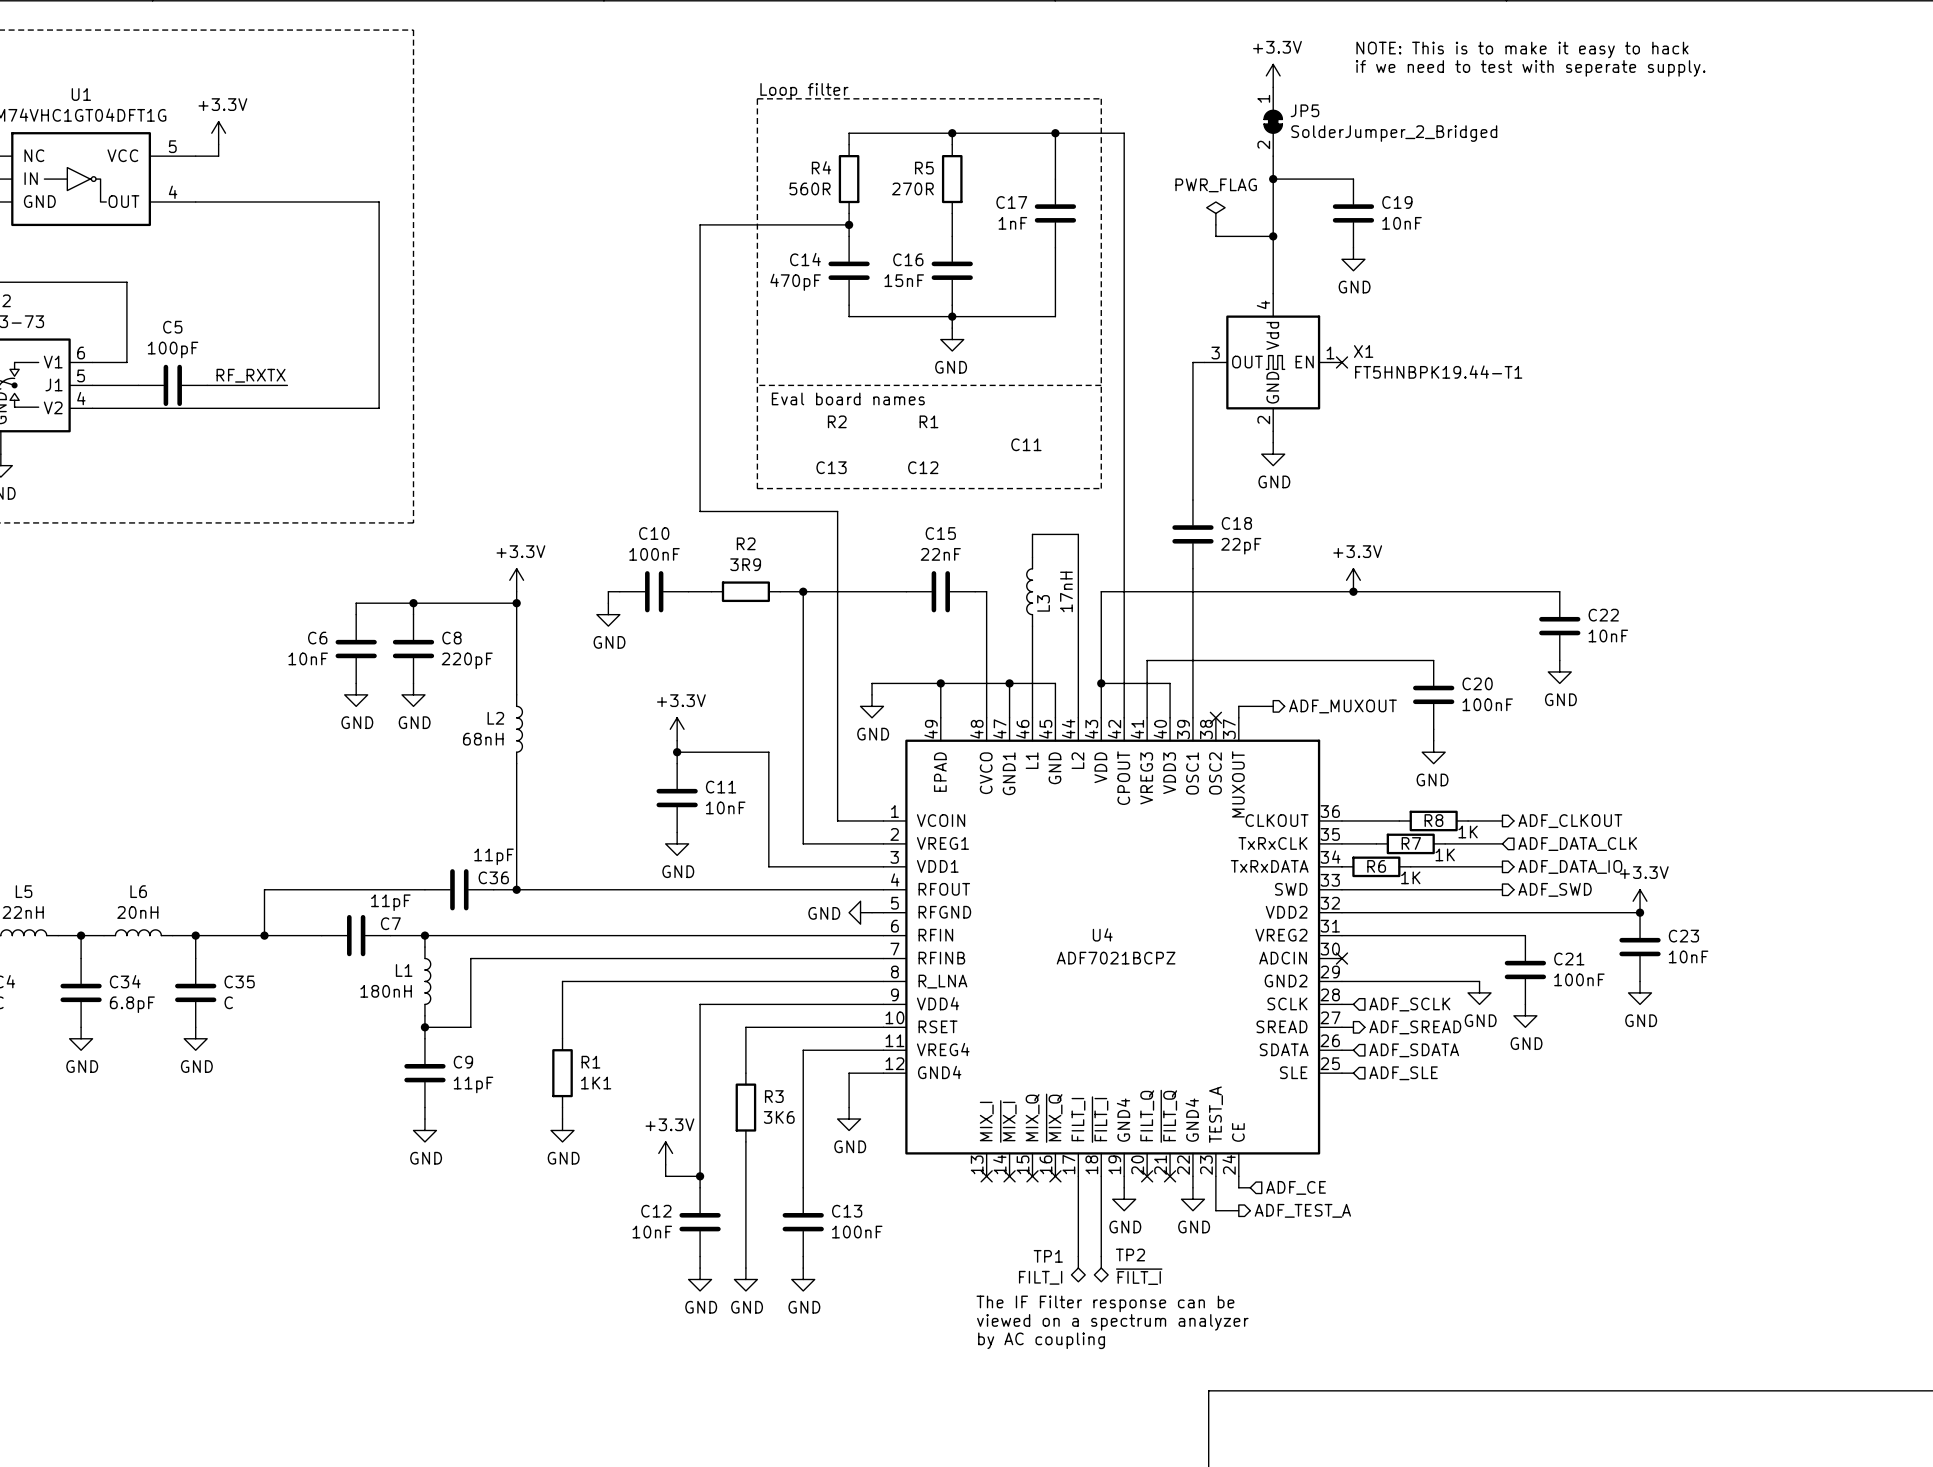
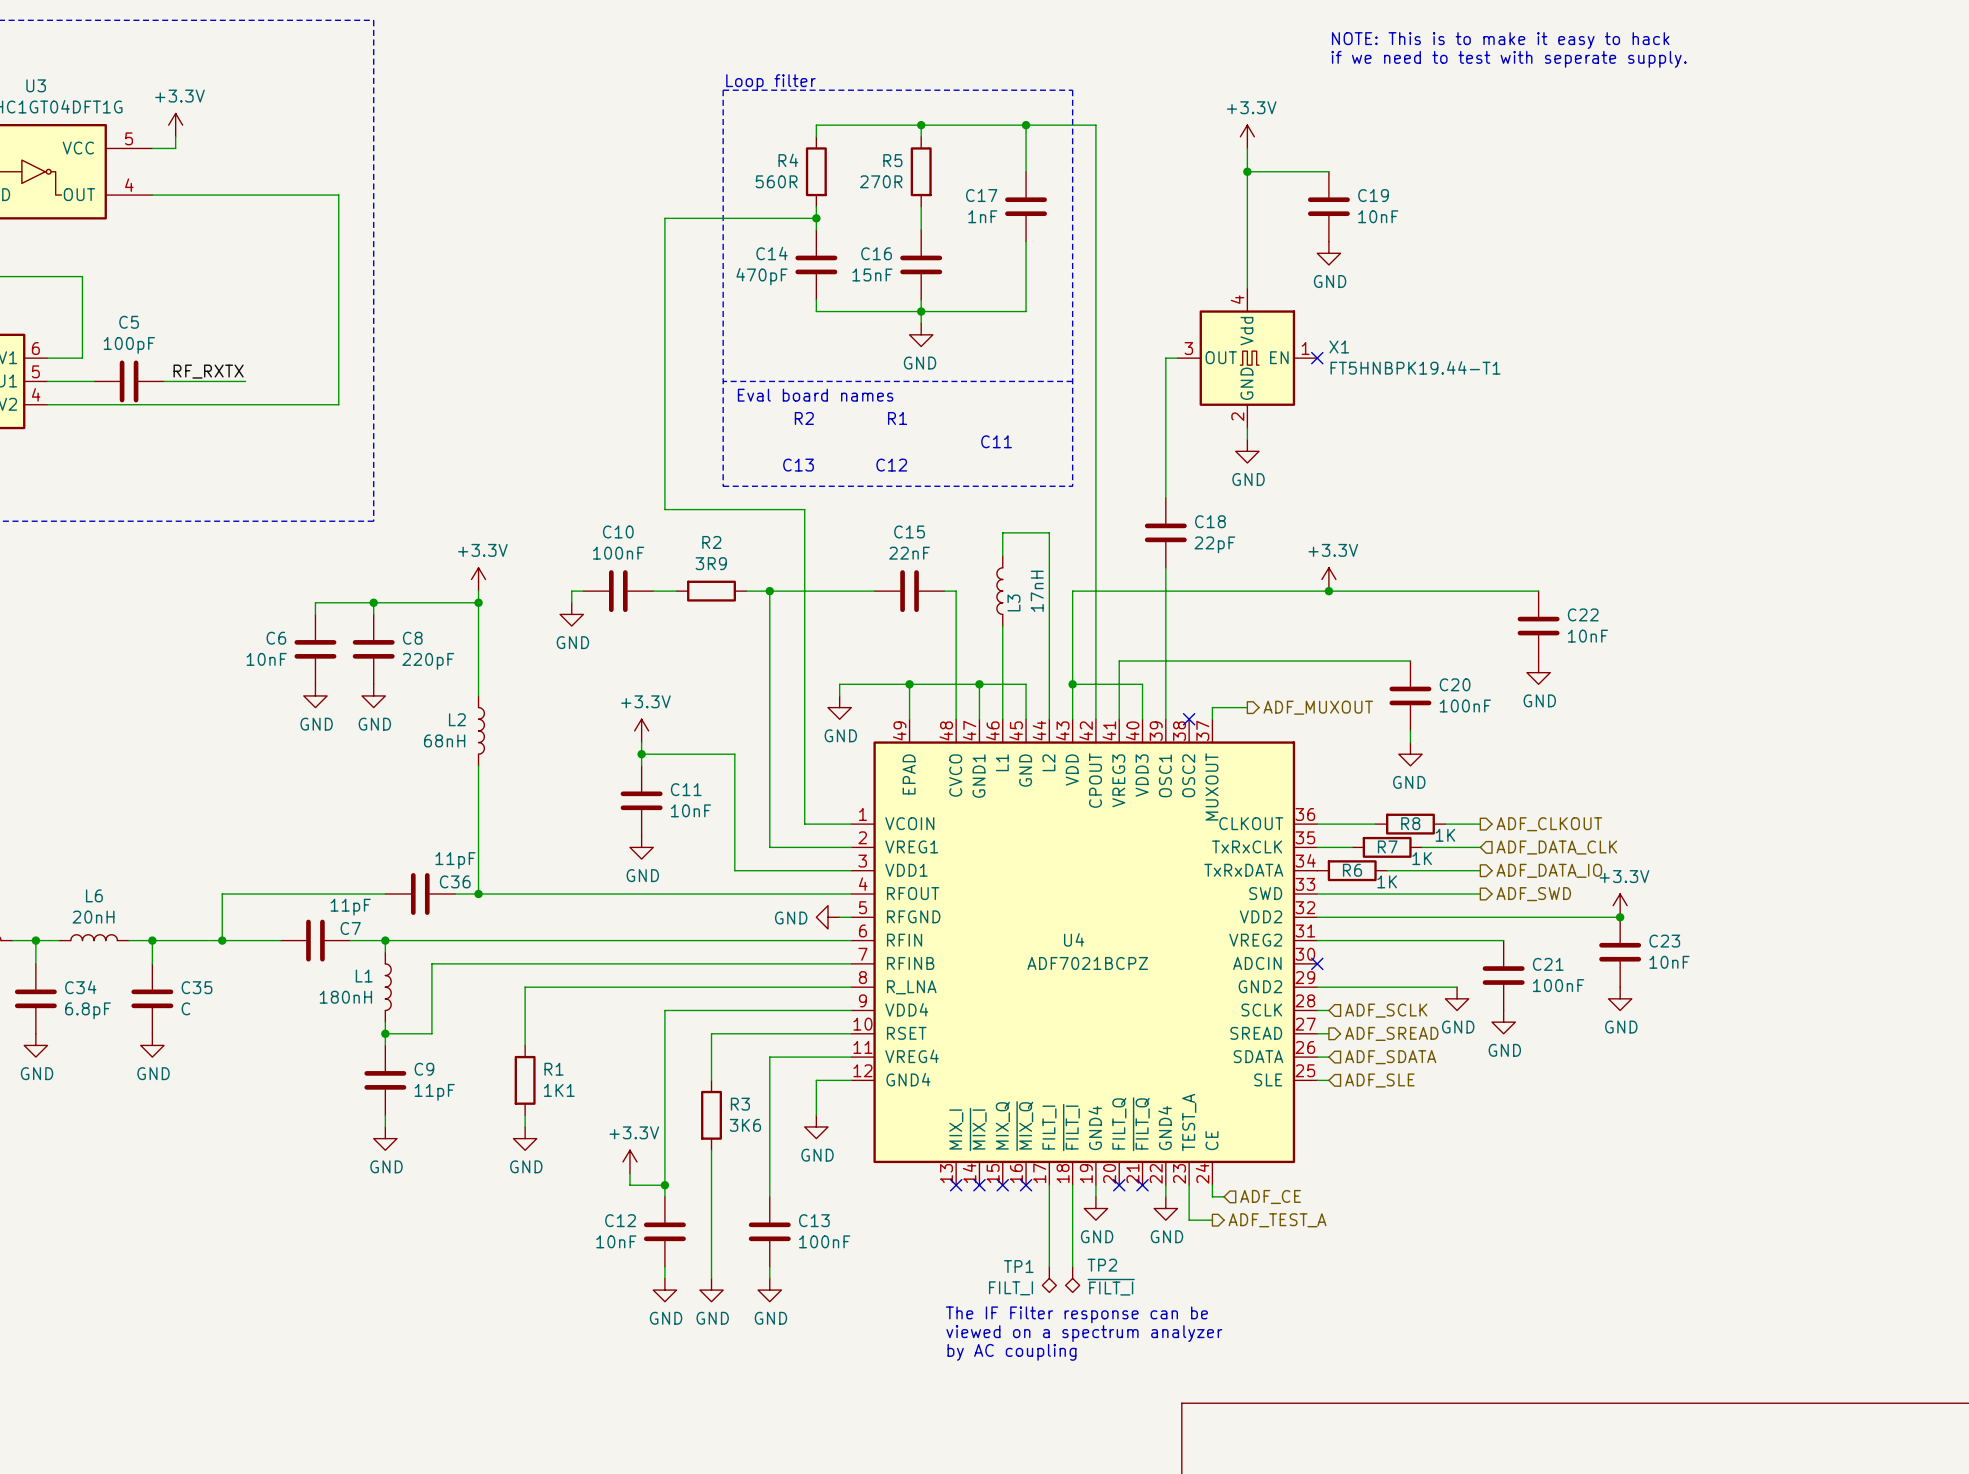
power symbol position: +3.3V (1273, 75) -> +3.3V (1247, 136)
U1 name: U1 (81, 94) -> U3 (36, 85)
JP5: SolderJumper_2_Bridged (1273, 121) -> none
power symbol: PWR_FLAG (1215, 213) -> none
wire: (1215, 224) (1215, 236) (1273, 236) -> none
junction: (1273, 236) -> none

